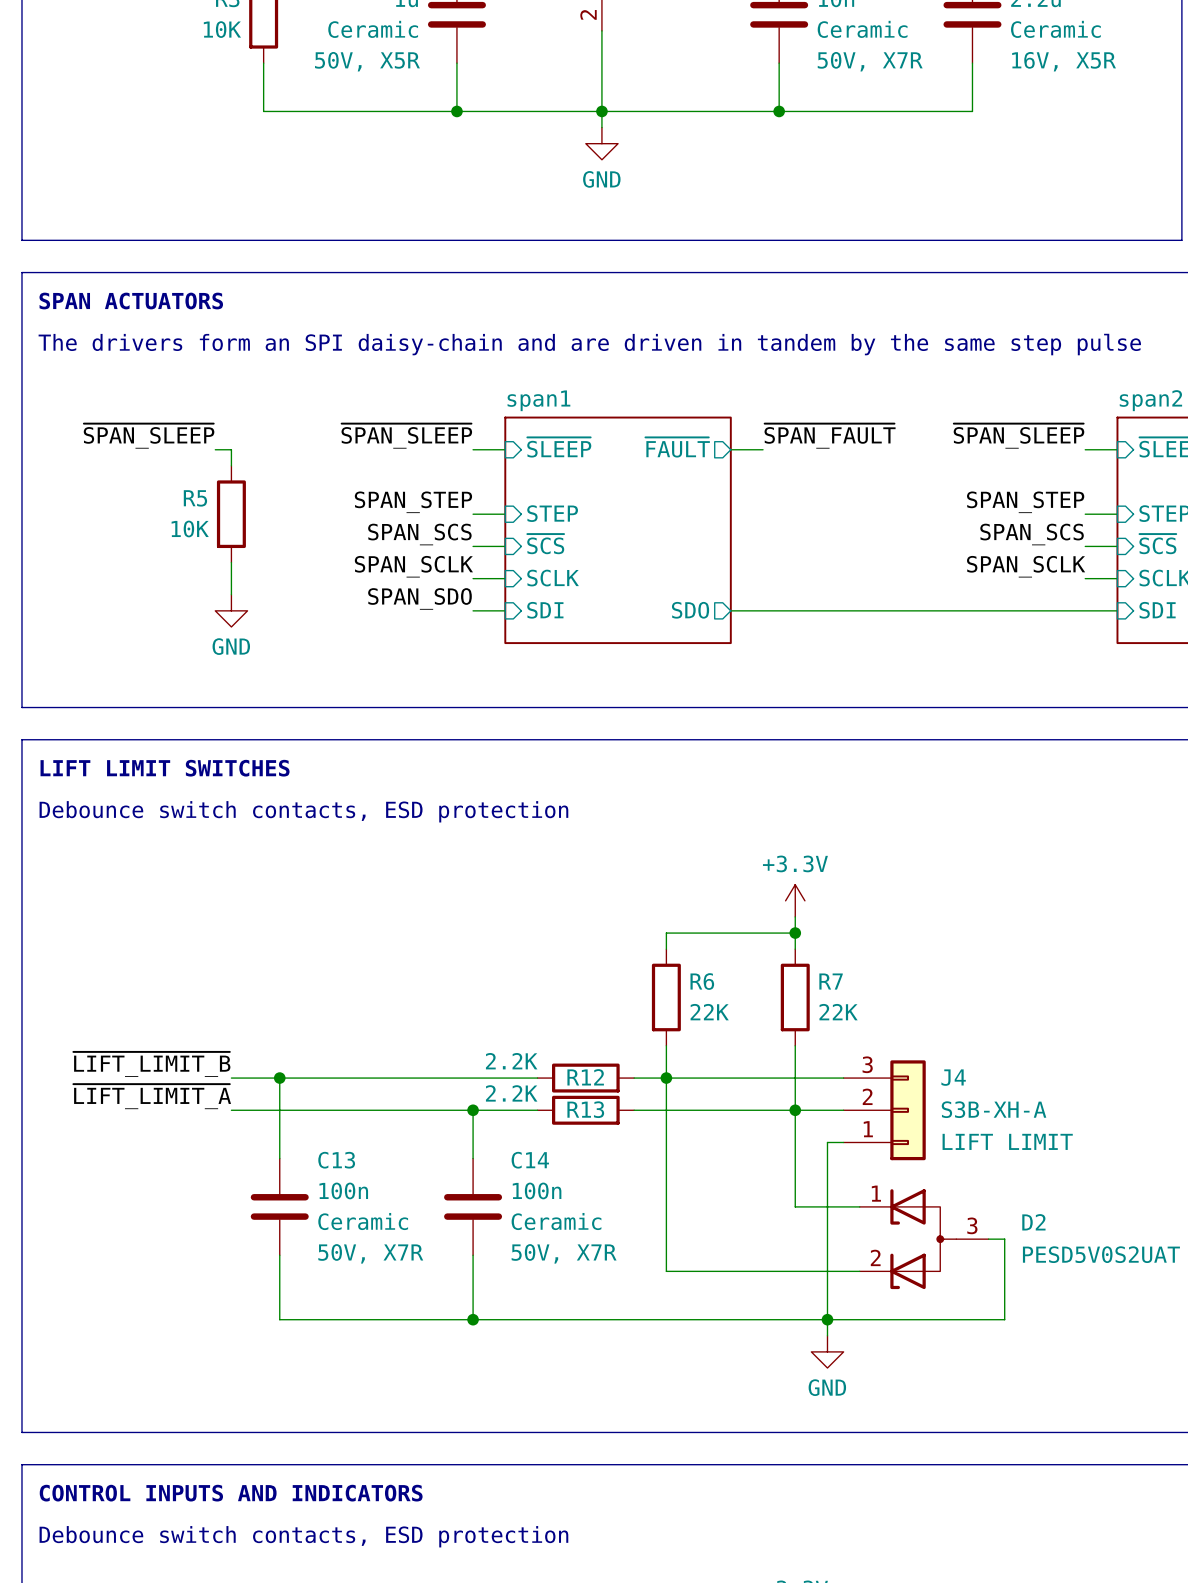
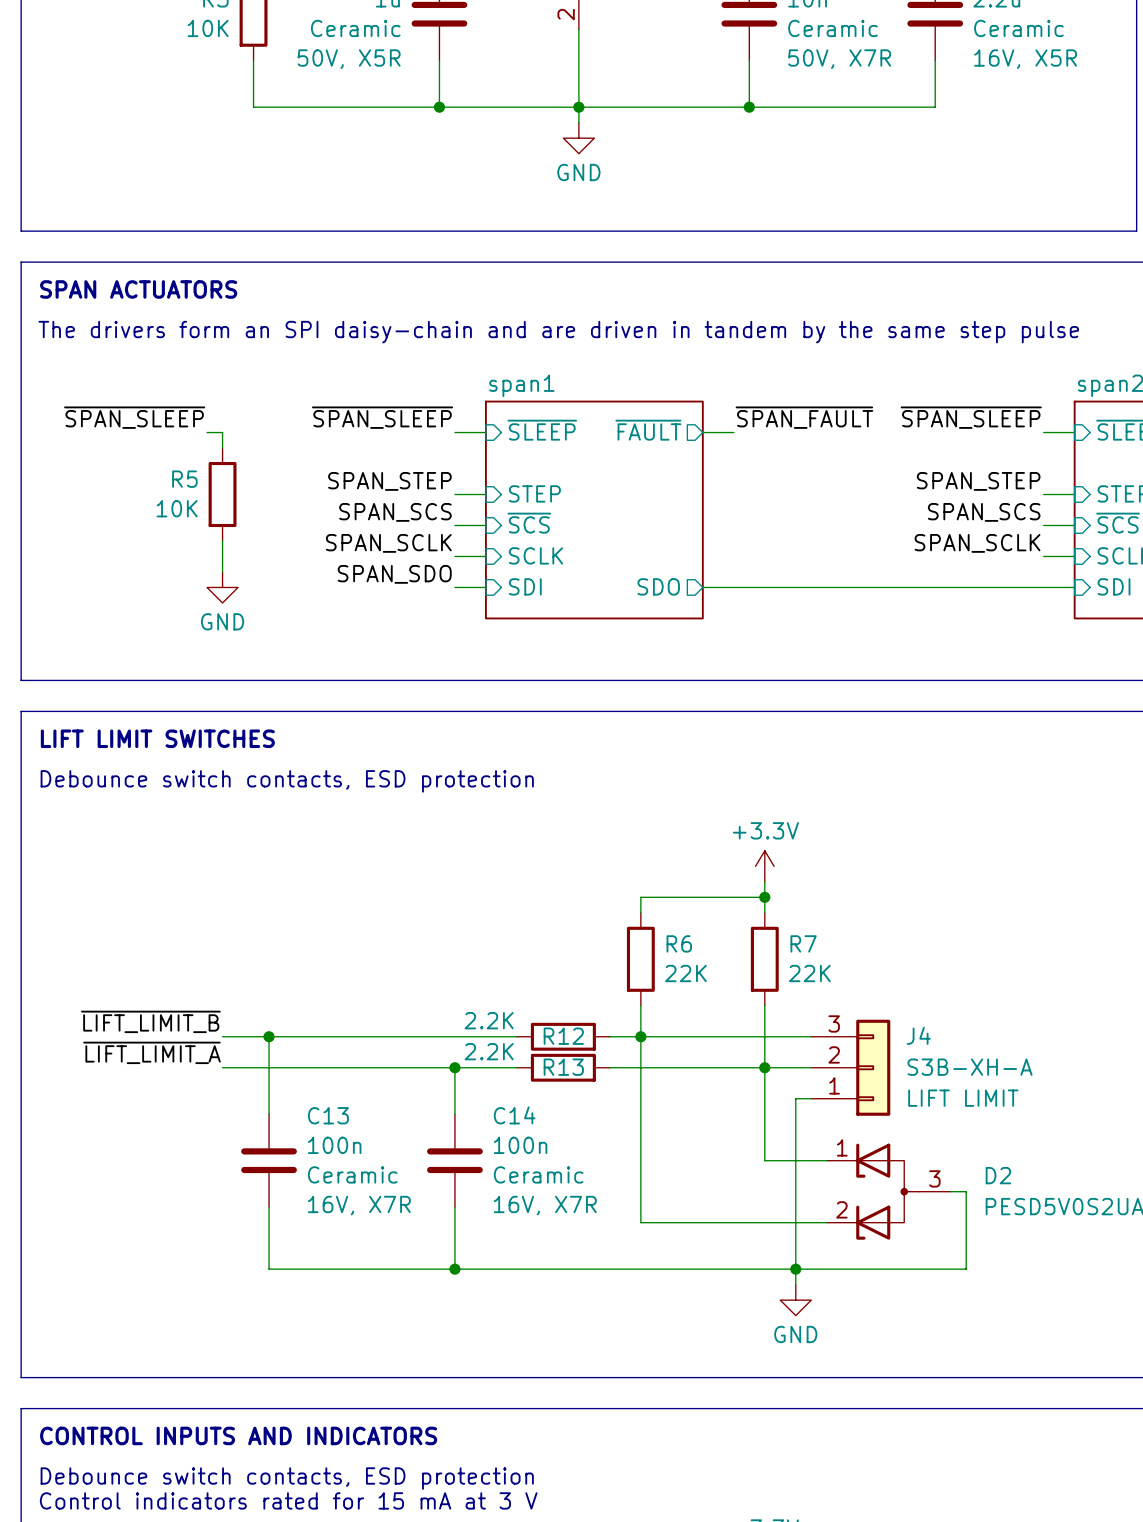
C13 text: 50V, X7R (370, 1253) -> 16V, X7R (359, 1205)
C14 text: 50V, X7R (564, 1253) -> 16V, X7R (545, 1205)
text: none -> Control indicators rated for 15 mA at 3 V (288, 1500)

